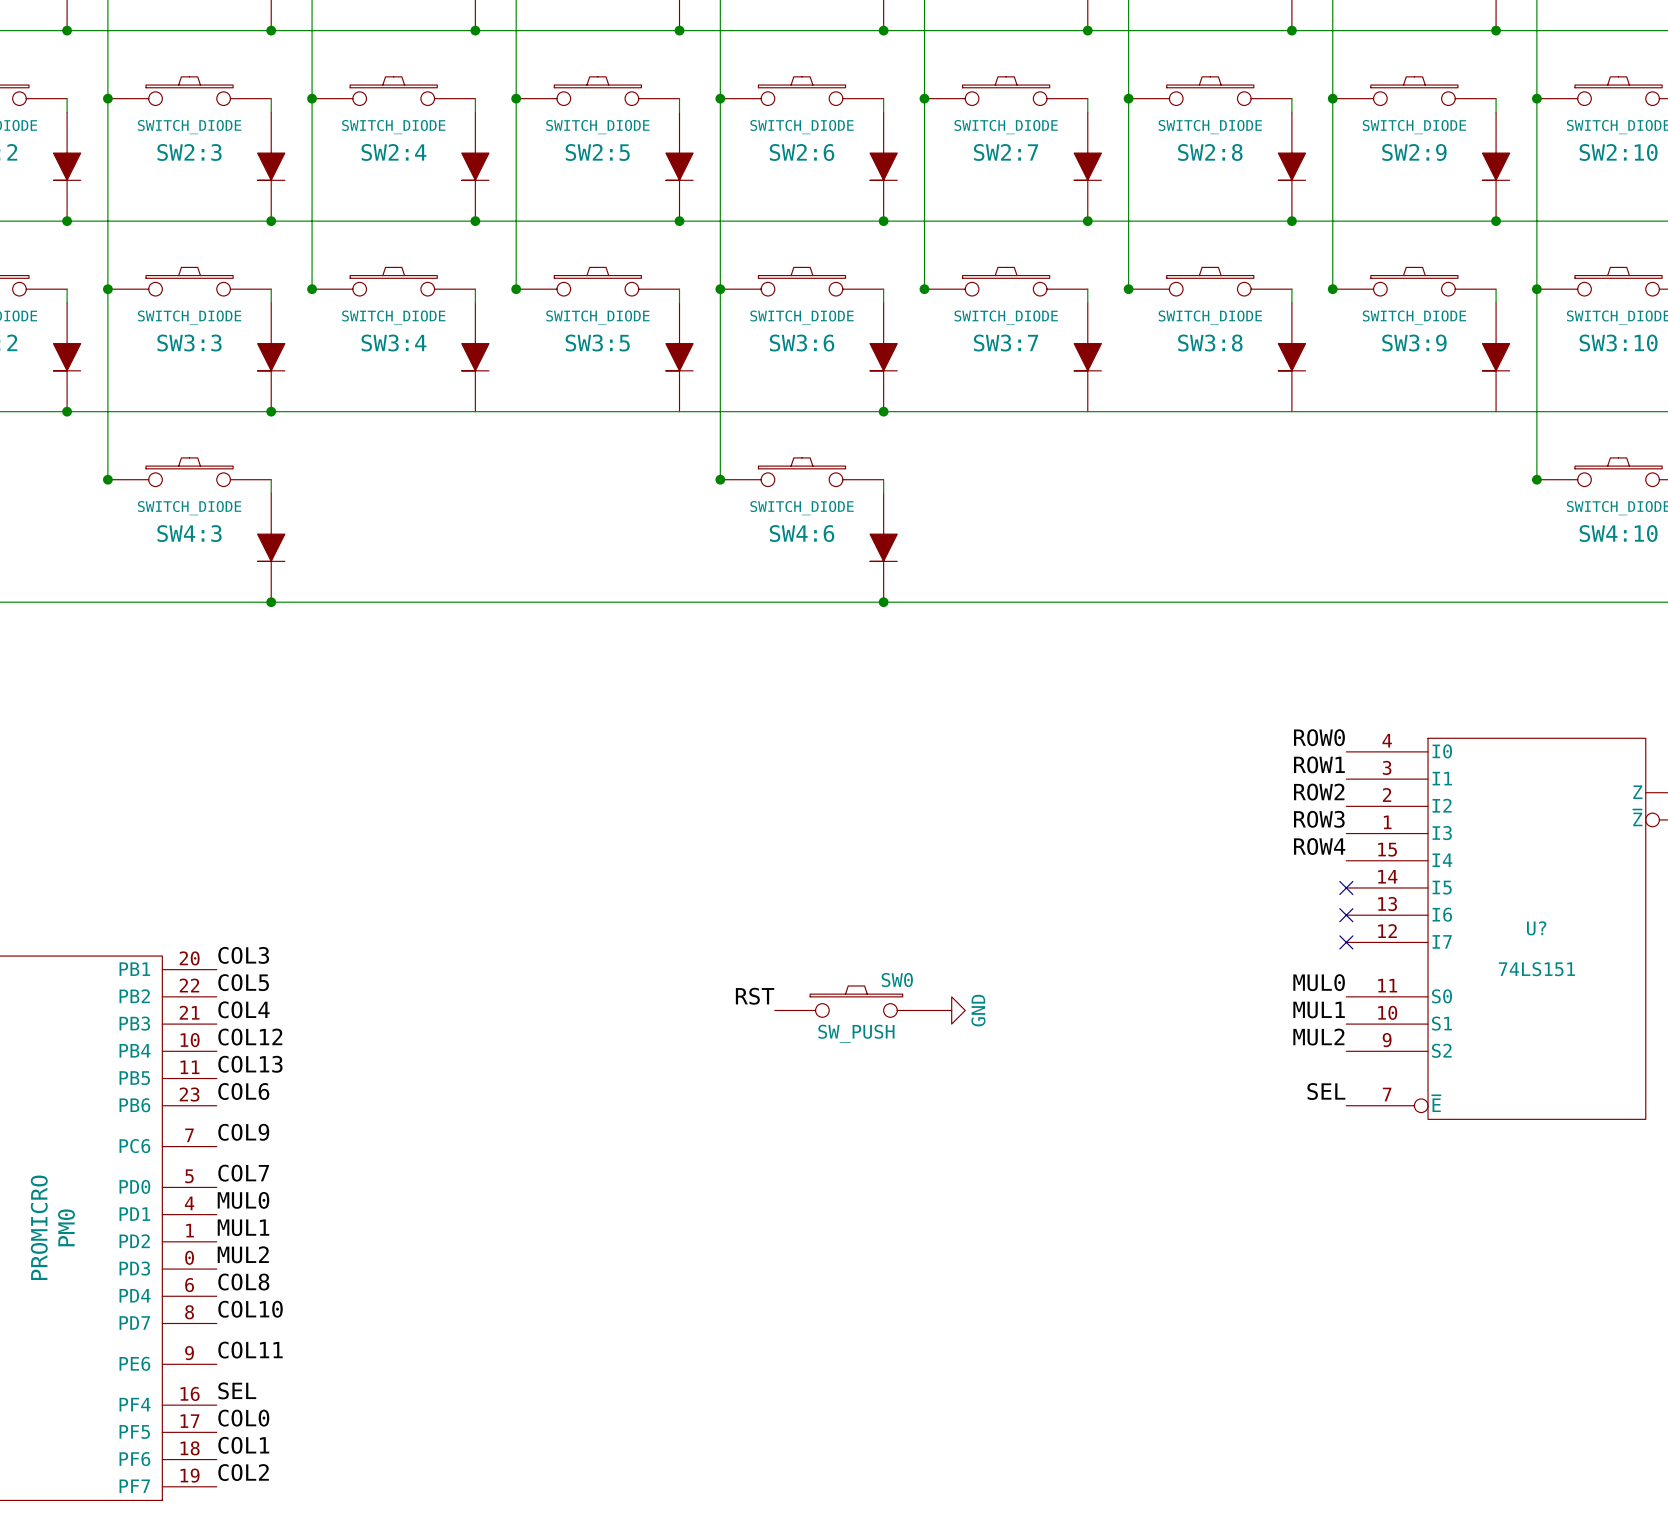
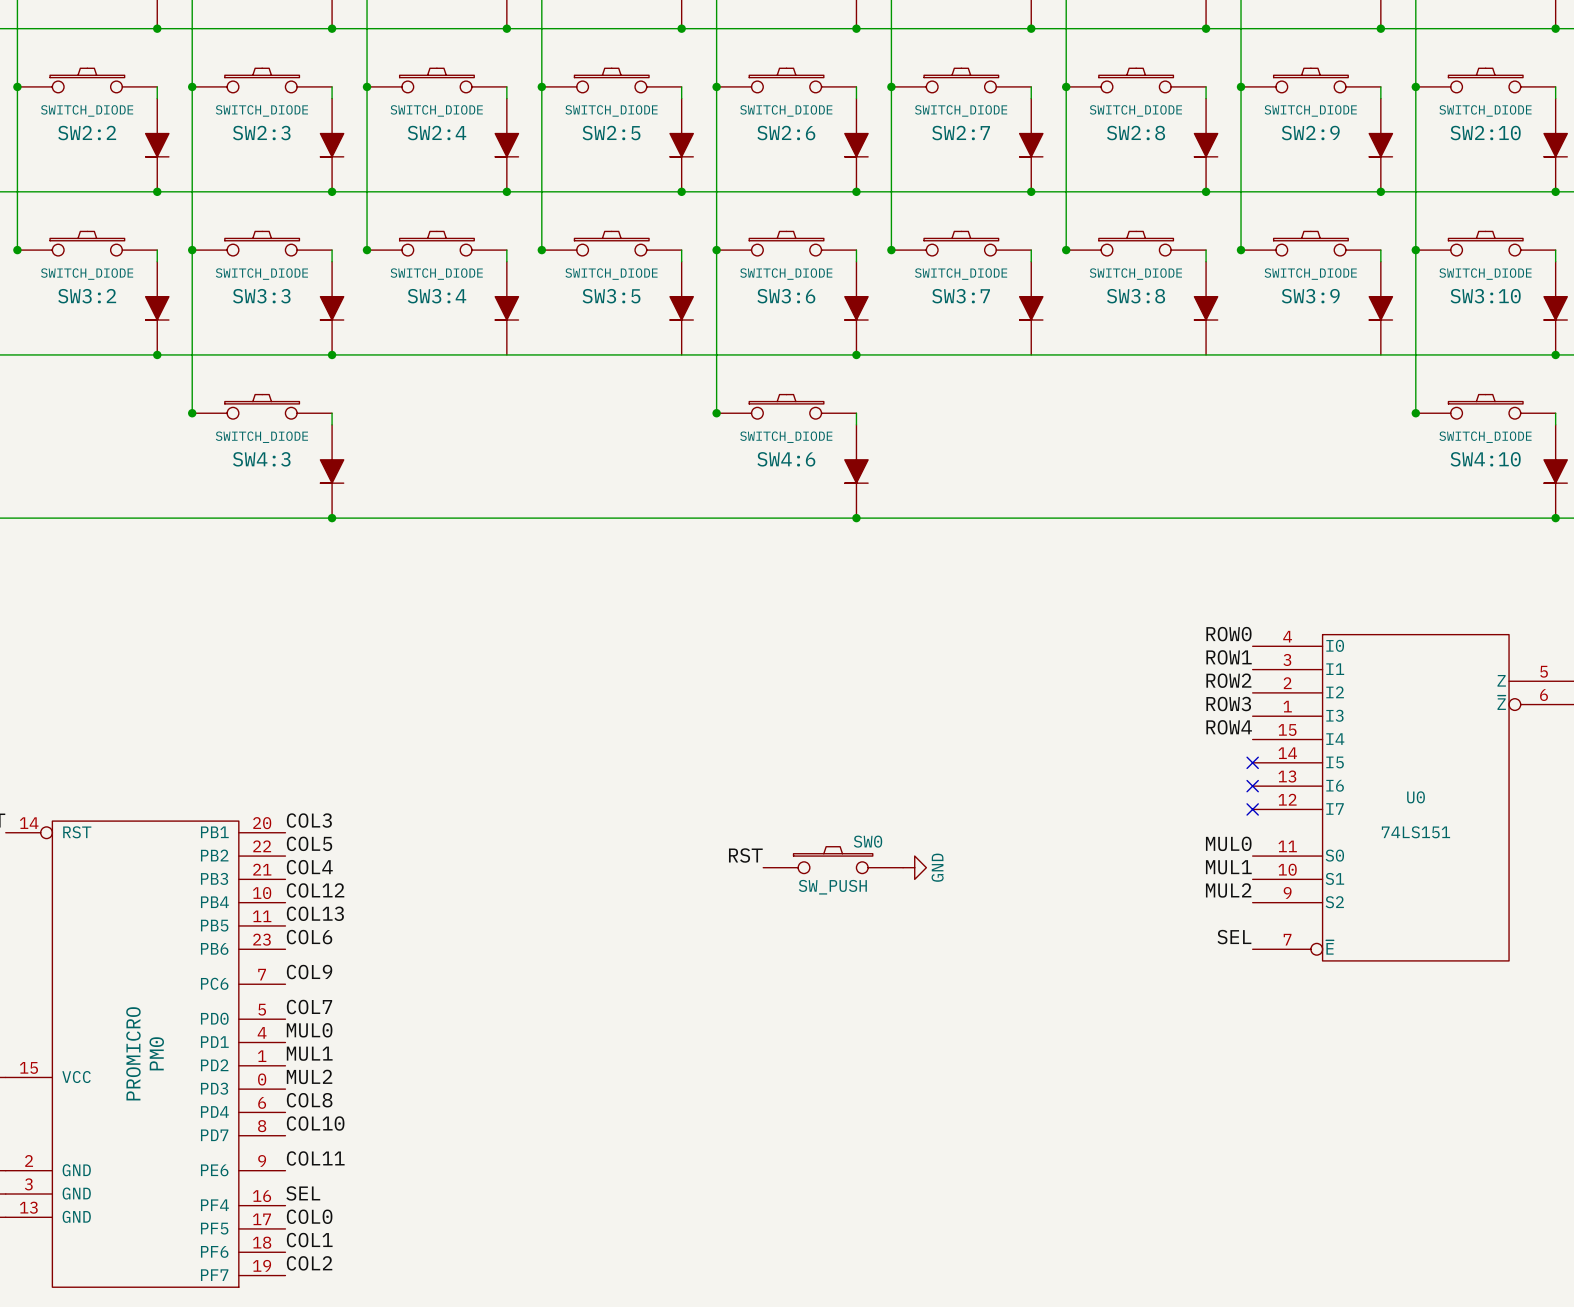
U? name: U? (1536, 928) -> U0 (1416, 797)

